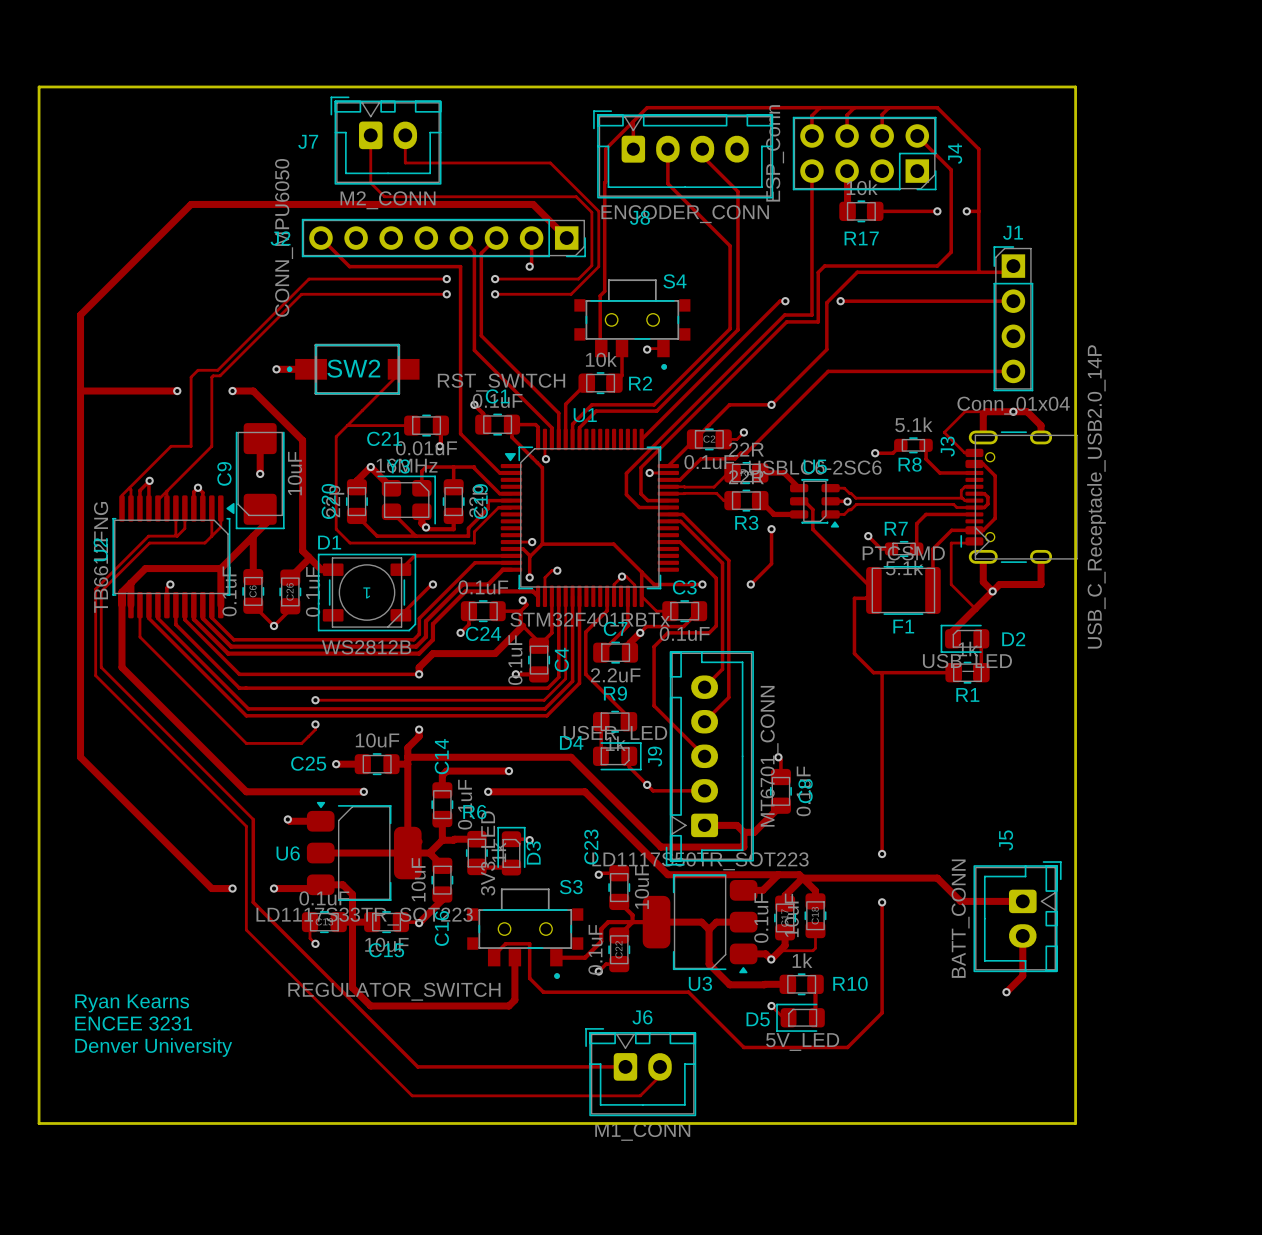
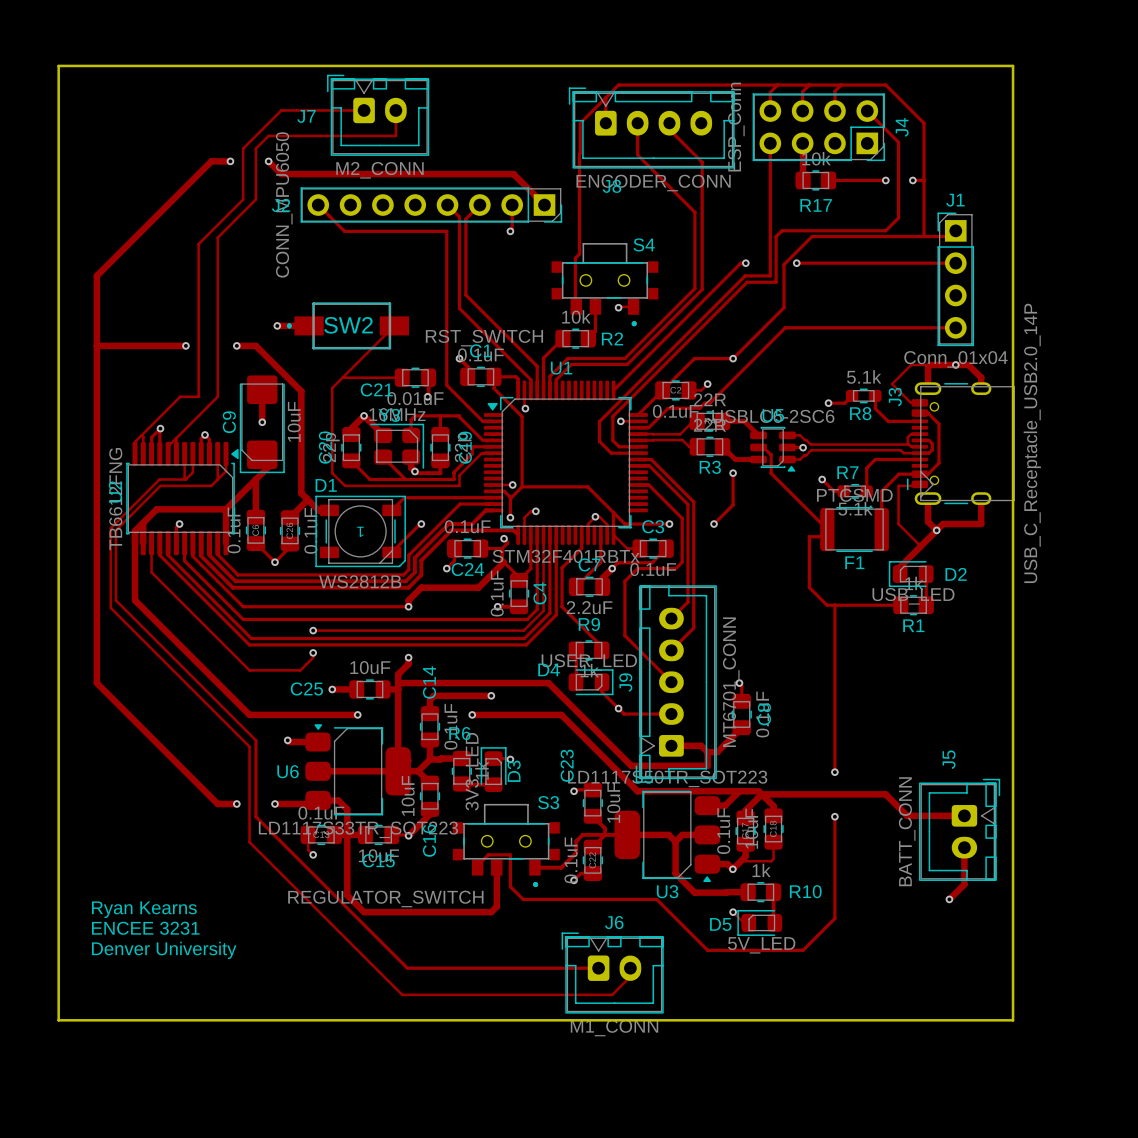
track: (370, 135) (370, 182) (384, 196) (576, 196) (591, 212) (591, 265) (578, 279) (495, 279) -> none
track: (405, 162) (550, 162) (598, 211) (598, 266) (571, 294) (495, 294) -> none
via: none -> (230, 161)
track: none -> (268, 161) (281, 174)
via: none -> (268, 161)
track: (191, 204) (280, 204) -> (198, 174) (211, 161) (230, 161)
track: (446, 279) (309, 279) (217, 370) (198, 370) (191, 377) -> (364, 110) (281, 110) (243, 148) (243, 199) (198, 244) (198, 333)
via: (446, 279) -> none
via: (495, 279) -> none
track: (446, 294) (301, 294) (220, 375) (211, 377) -> (395, 135) (268, 135) (255, 148) (255, 199) (217, 237) (217, 333)
via: (446, 294) -> none
via: (495, 294) -> none

